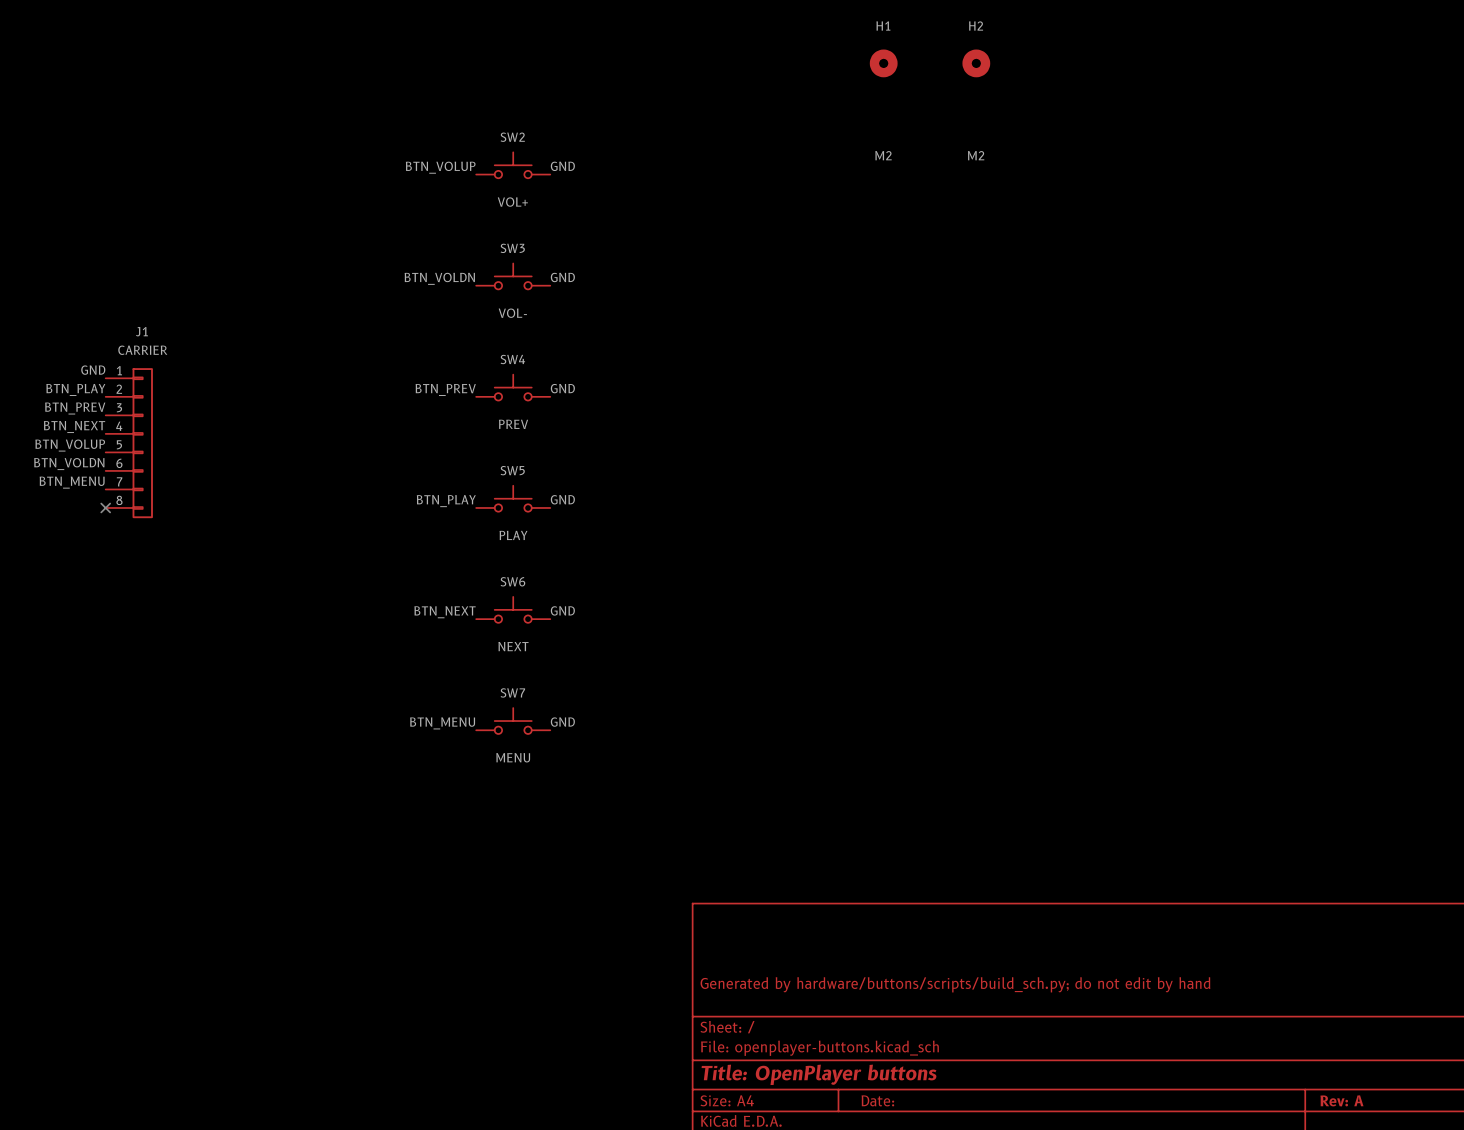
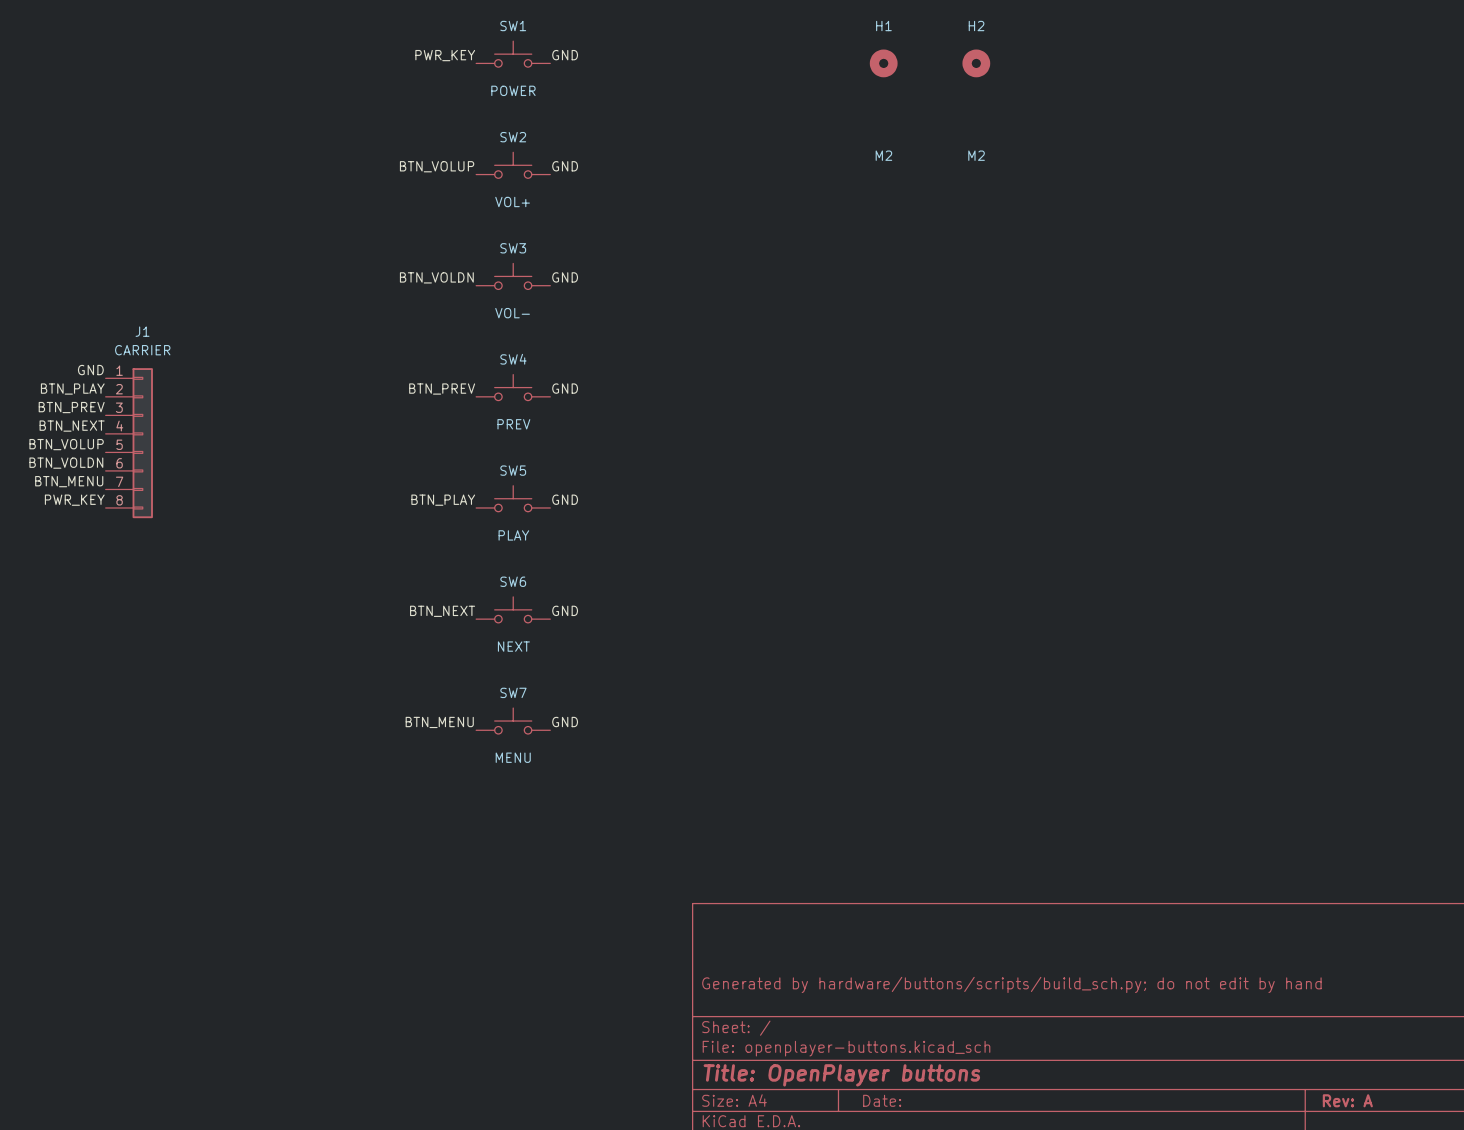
SW1: none -> POWER (513, 54)
label: none -> GND (565, 55)
label: none -> PWR_KEY (445, 55)
label: none -> PWR_KEY (74, 500)
no-connect mark: (105, 507) -> none

